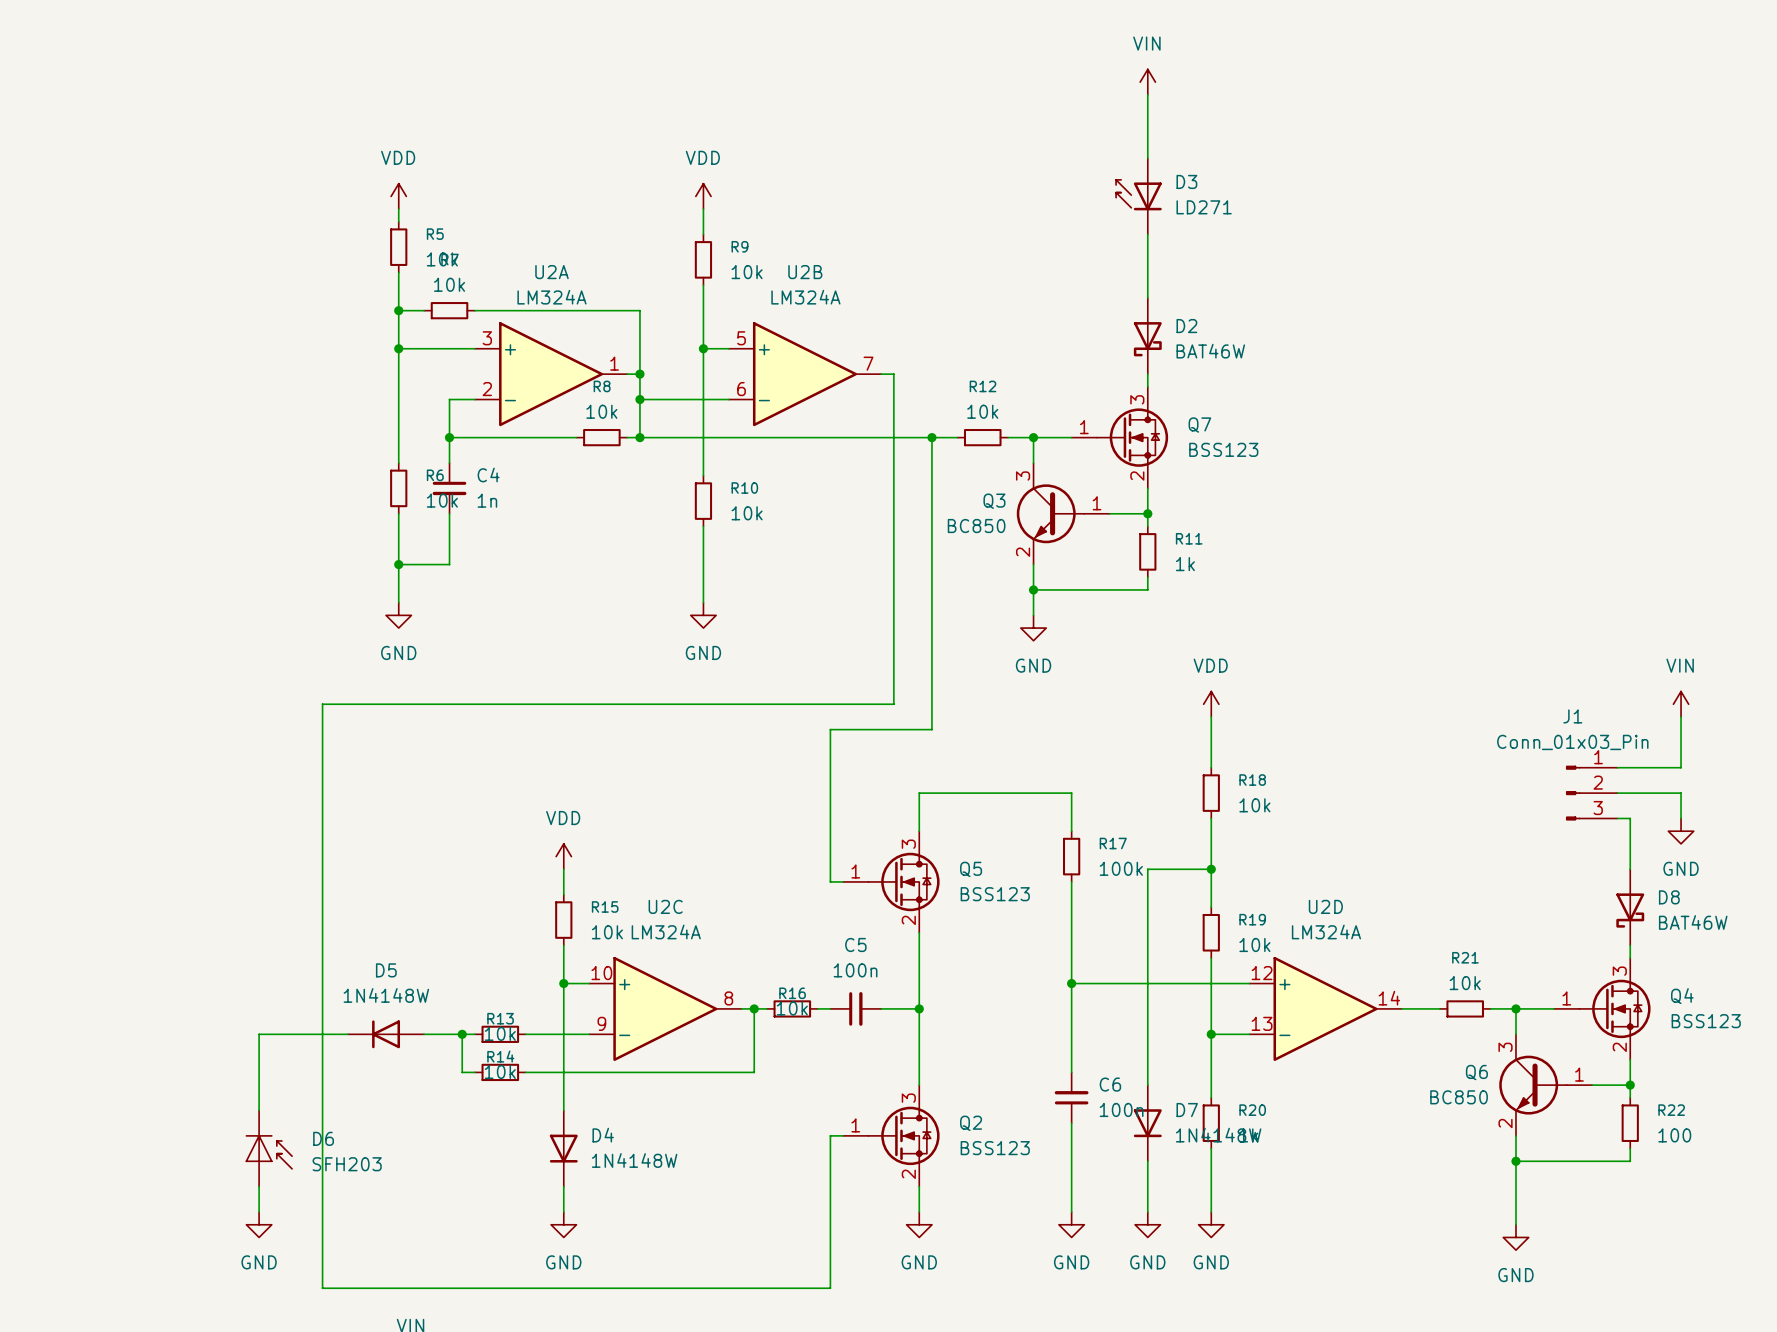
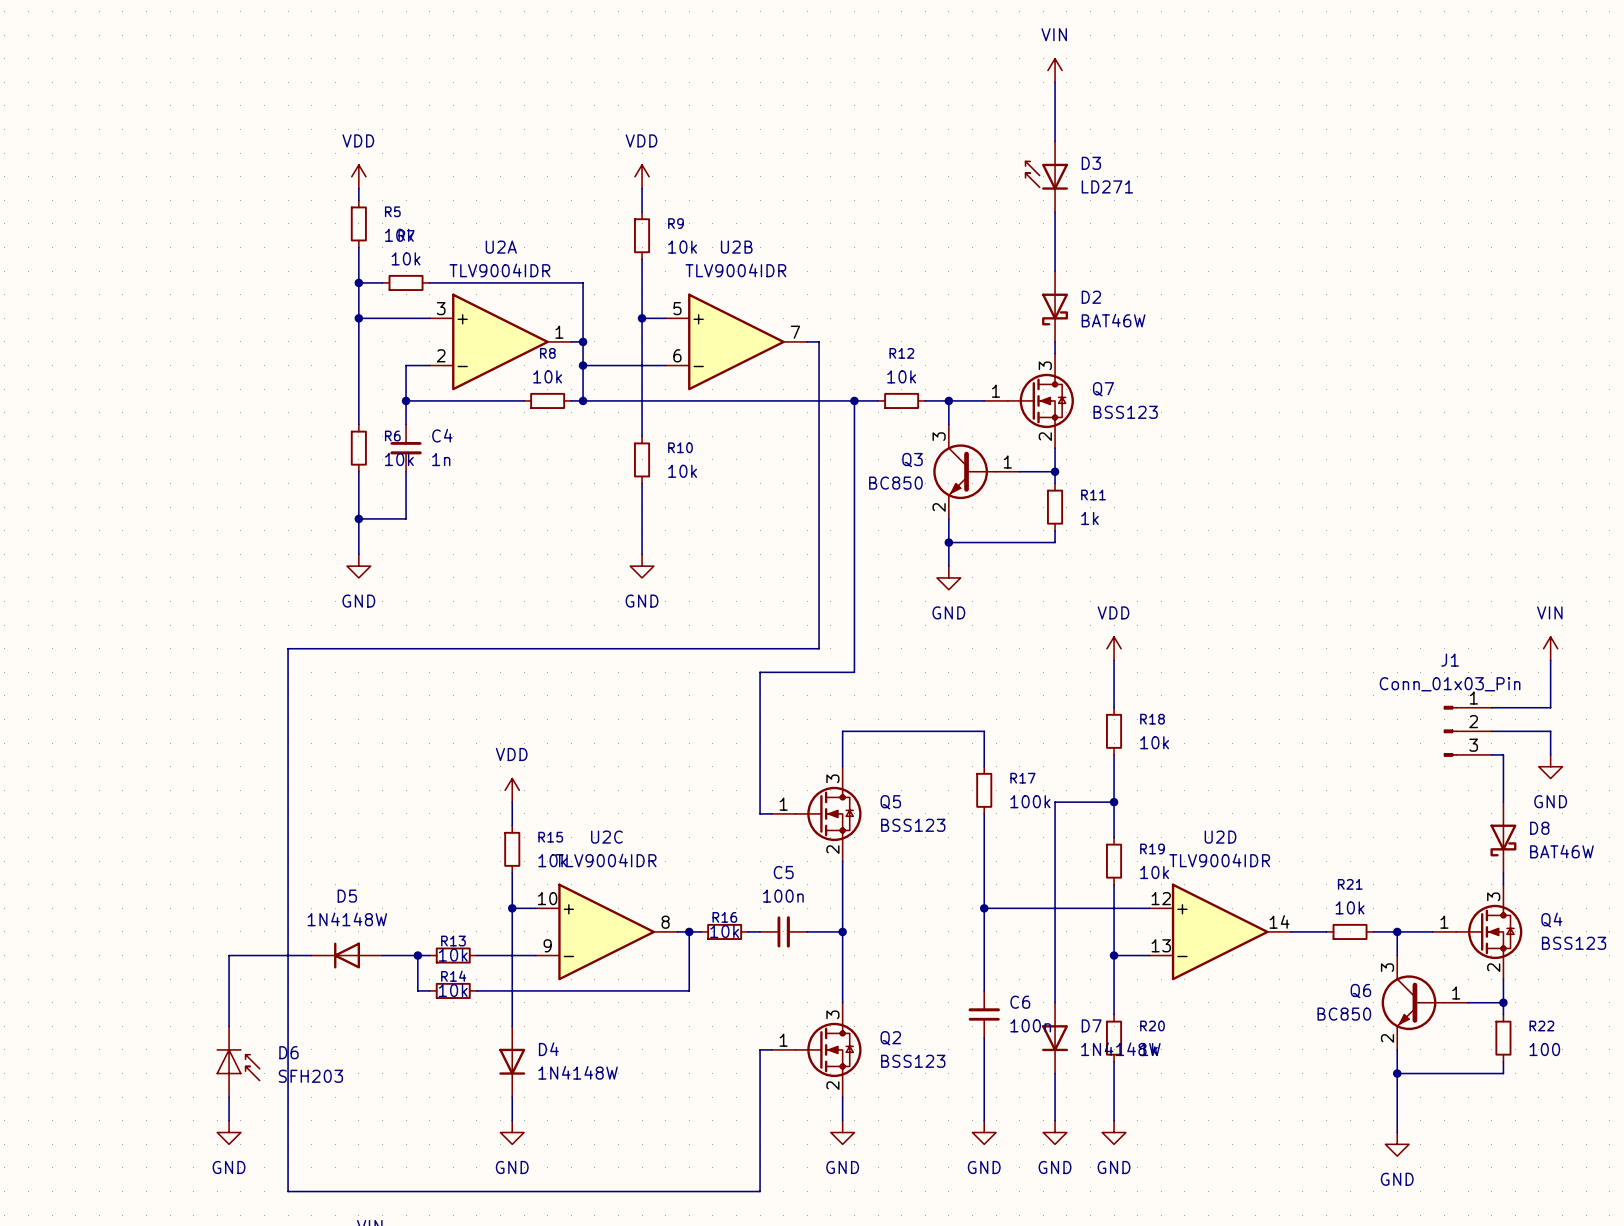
U2A value: LM324A (552, 297) -> TLV9004IDR (499, 270)
U2B value: LM324A (805, 297) -> TLV9004IDR (735, 270)
U2C value: LM324A (666, 931) -> TLV9004IDR (606, 860)
U2D value: LM324A (1326, 931) -> TLV9004IDR (1219, 860)

